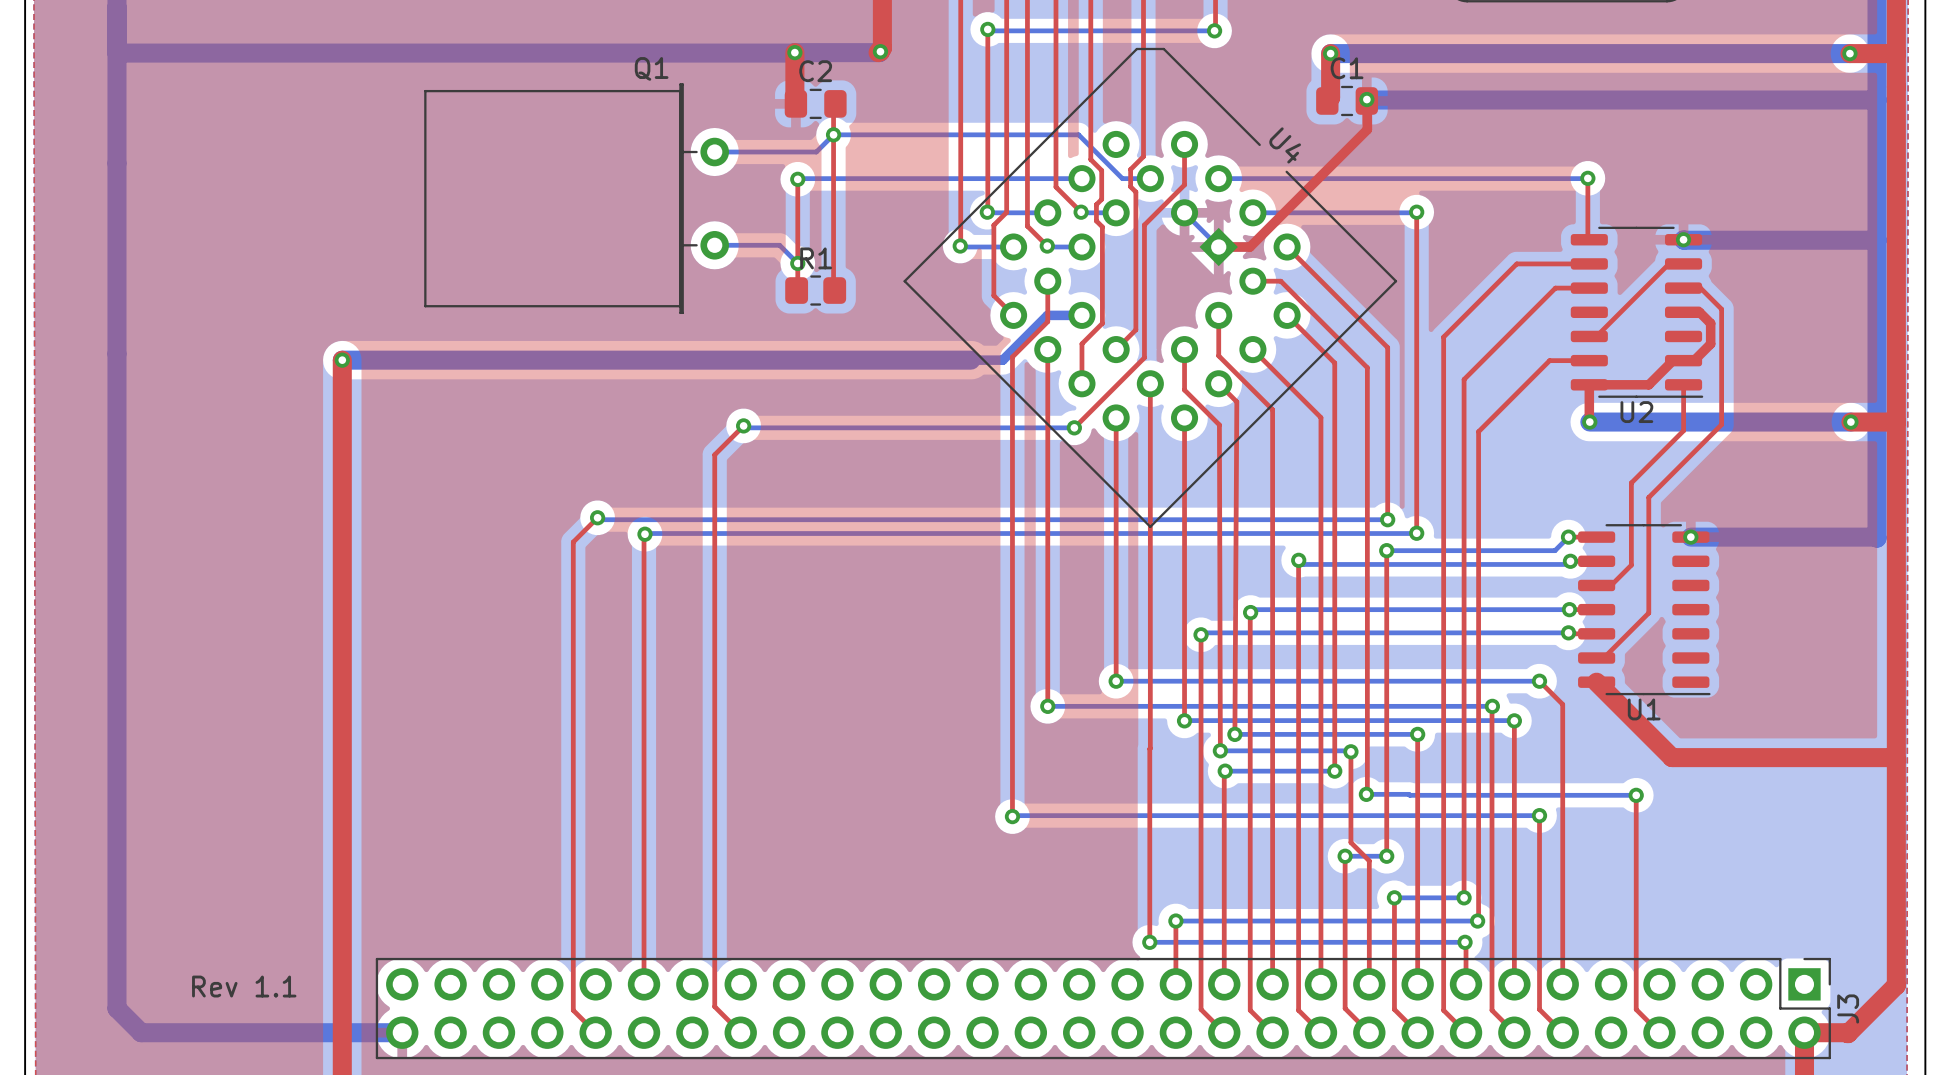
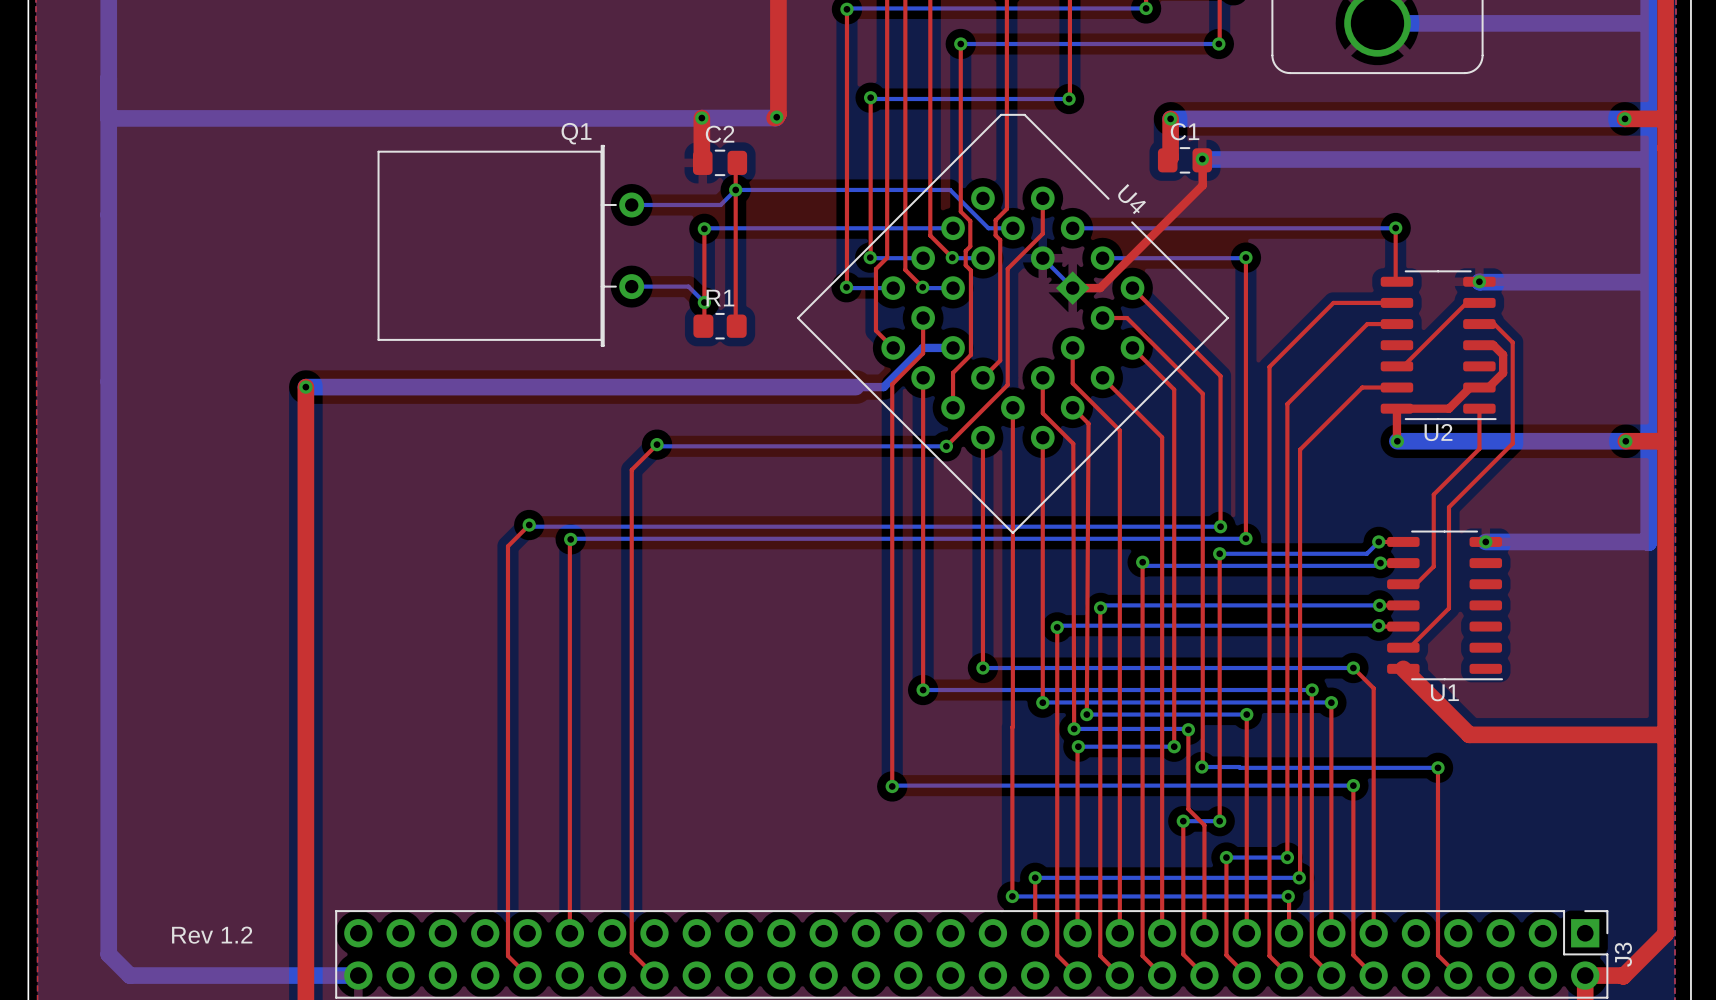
text: Rev 1.1 (244, 986) -> Rev 1.2 (212, 935)

